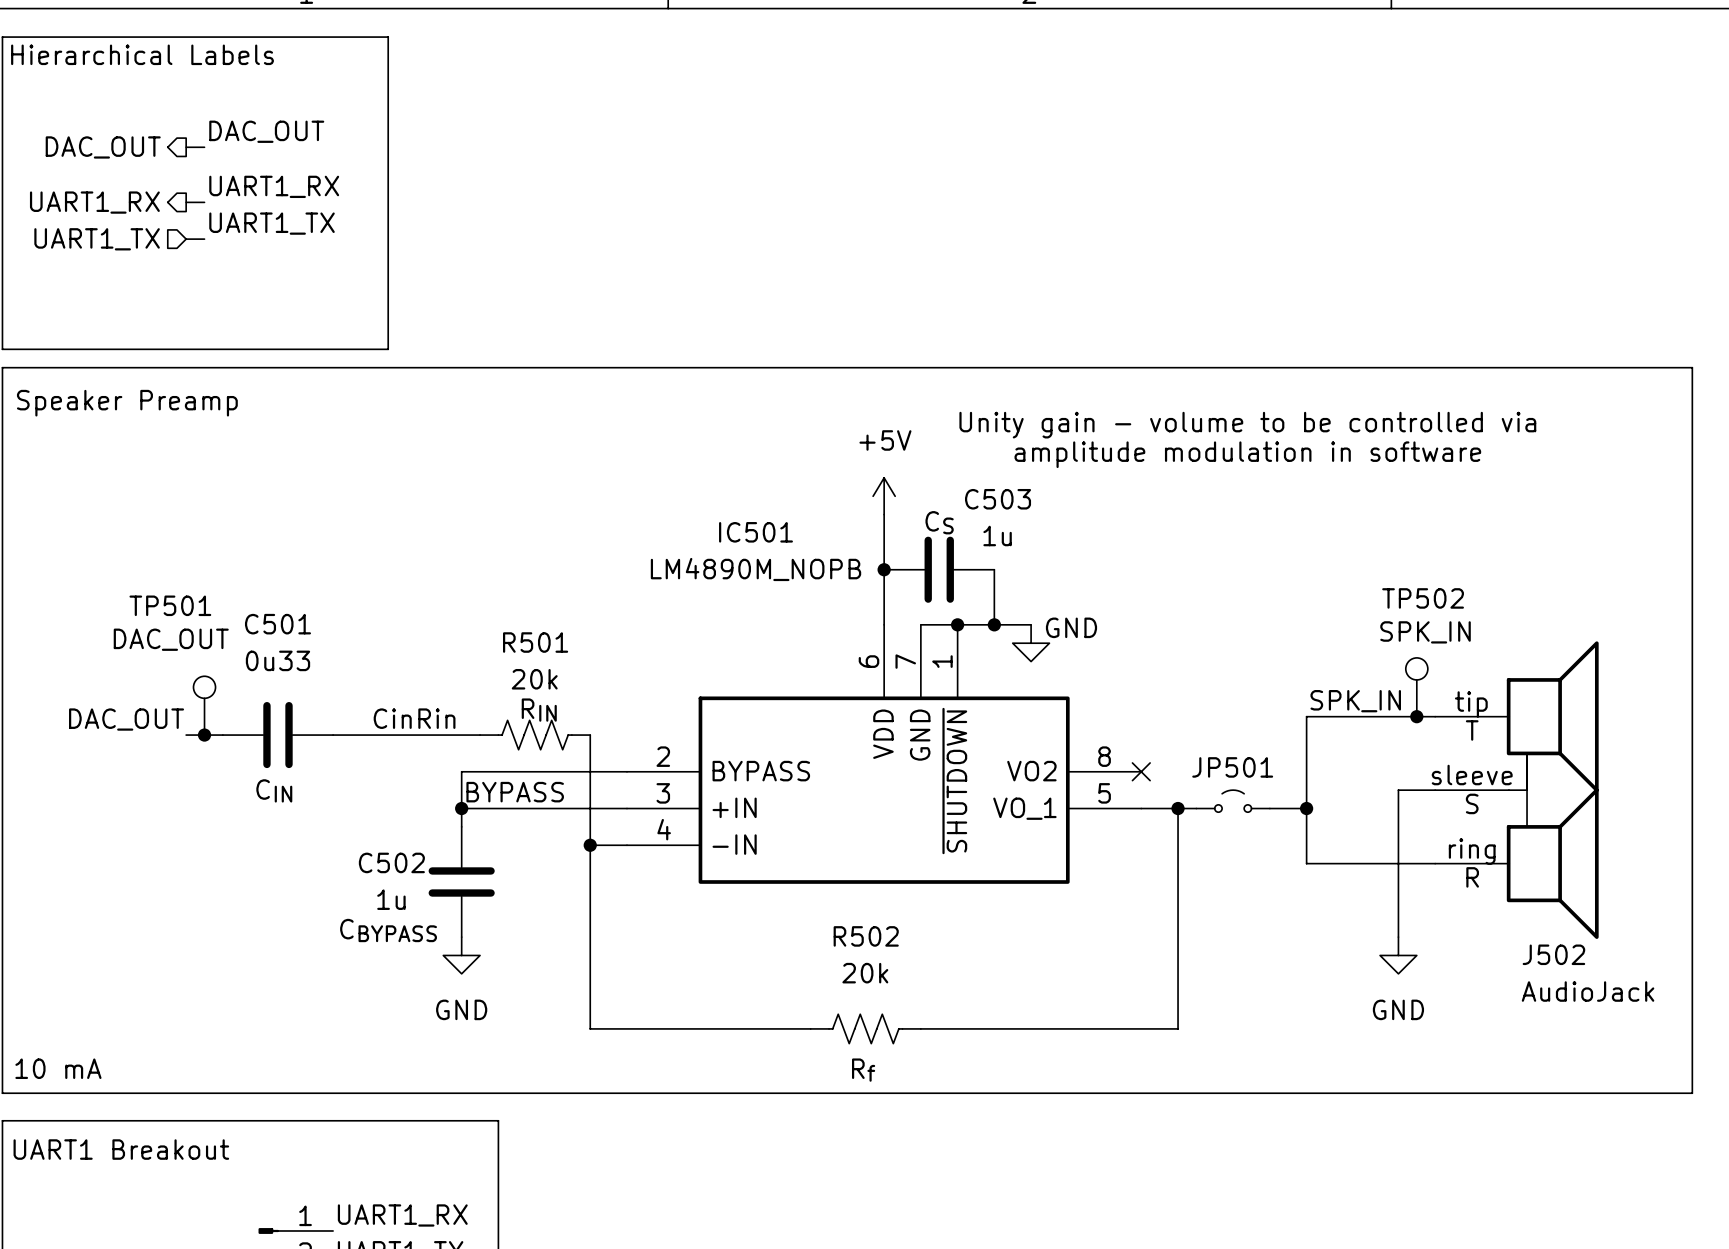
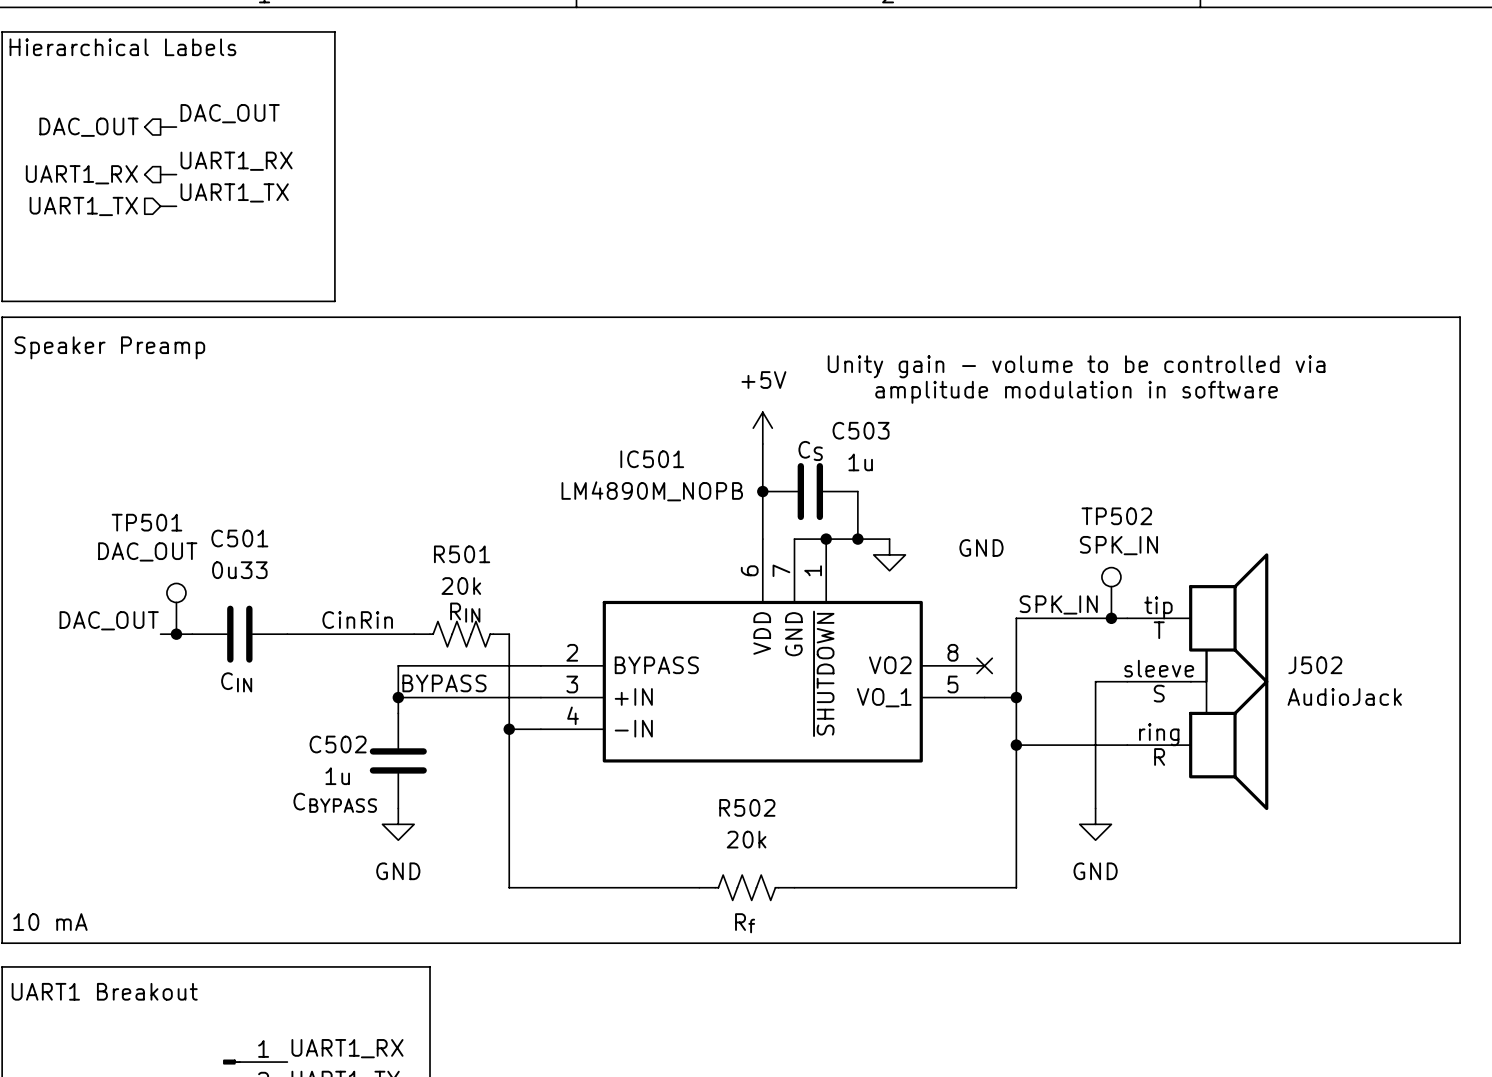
power symbol text position: GND (1071, 627) -> GND (981, 548)
TP502 position: (1416, 687) -> (1111, 592)
label position: SPK_IN (1355, 701) -> SPK_IN (1058, 604)
junction: none -> (1111, 618)
junction: (1416, 716) -> none
wire: (1435, 716) (1306, 716) (1306, 863) (1435, 863) -> none
wire: (1435, 790) (1398, 790) (1398, 937) -> (1127, 681) (1095, 681) (1095, 808)
J502 position: (1516, 790) -> (1197, 681)
JP501: (1233, 801) -> none
wire: (1178, 808) (1196, 808) -> (1016, 697) (1016, 618) (1127, 618)
wire: (1269, 808) (1306, 808) -> none
junction: (1306, 808) -> none
wire: none -> (1016, 745) (1127, 745)
junction: none -> (1016, 745)
J502 name position: J502 (1553, 954) -> J502 (1315, 665)
power symbol position: GND (1398, 955) -> GND (1095, 824)
J502 value position: AudioJack (1588, 991) -> AudioJack (1344, 696)

